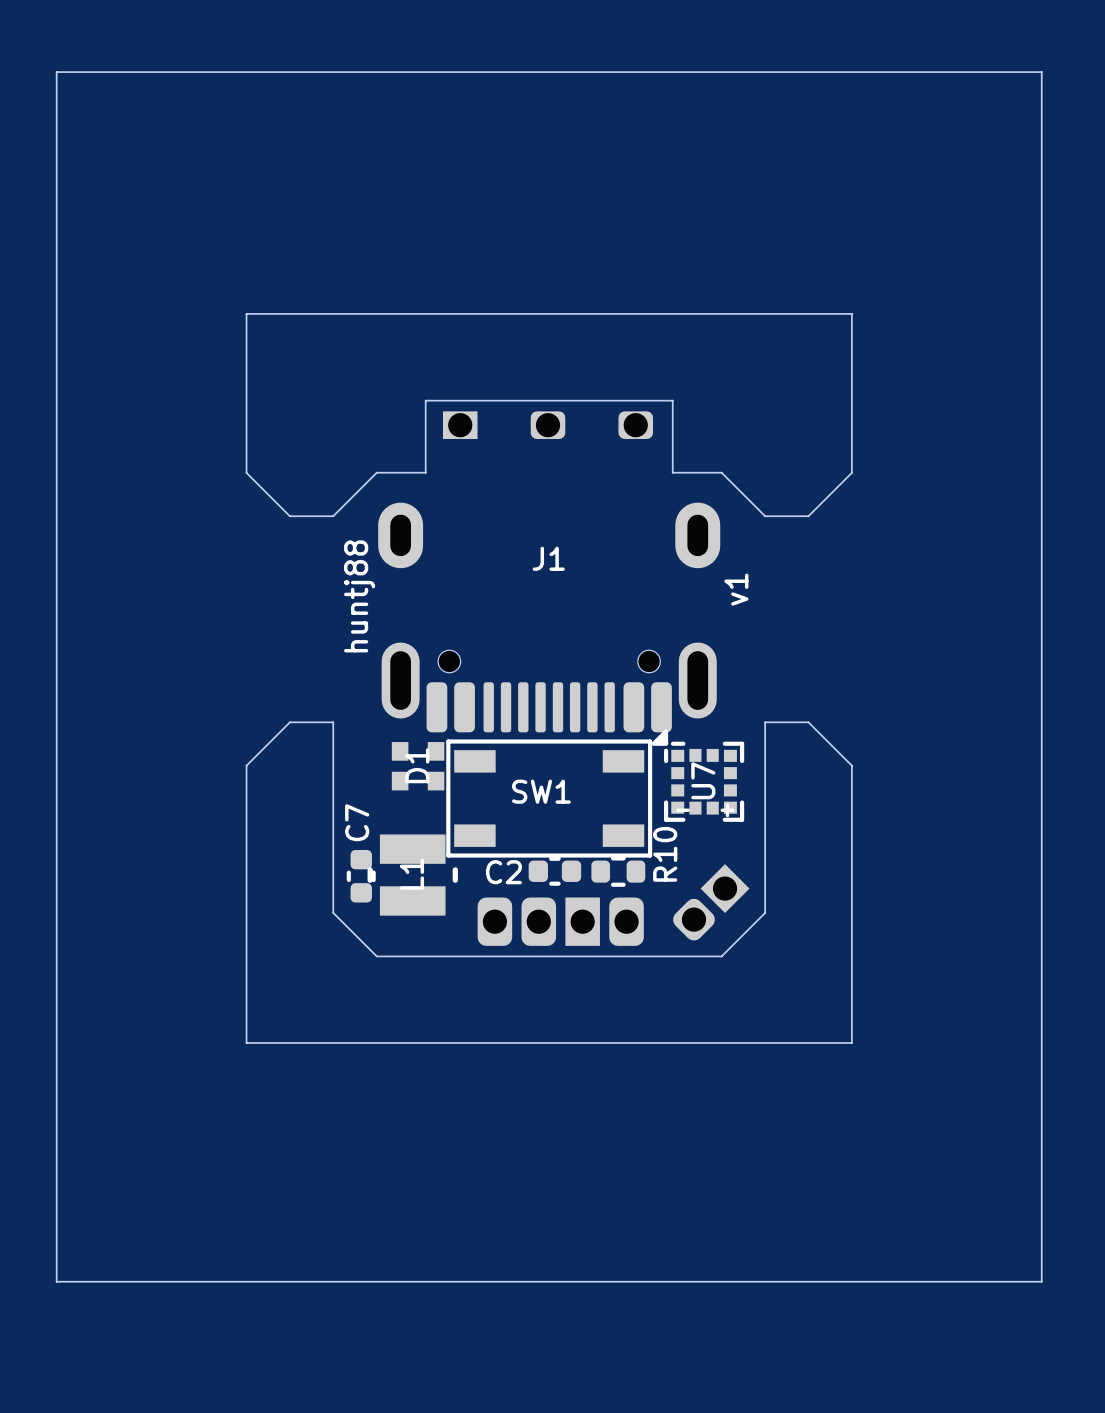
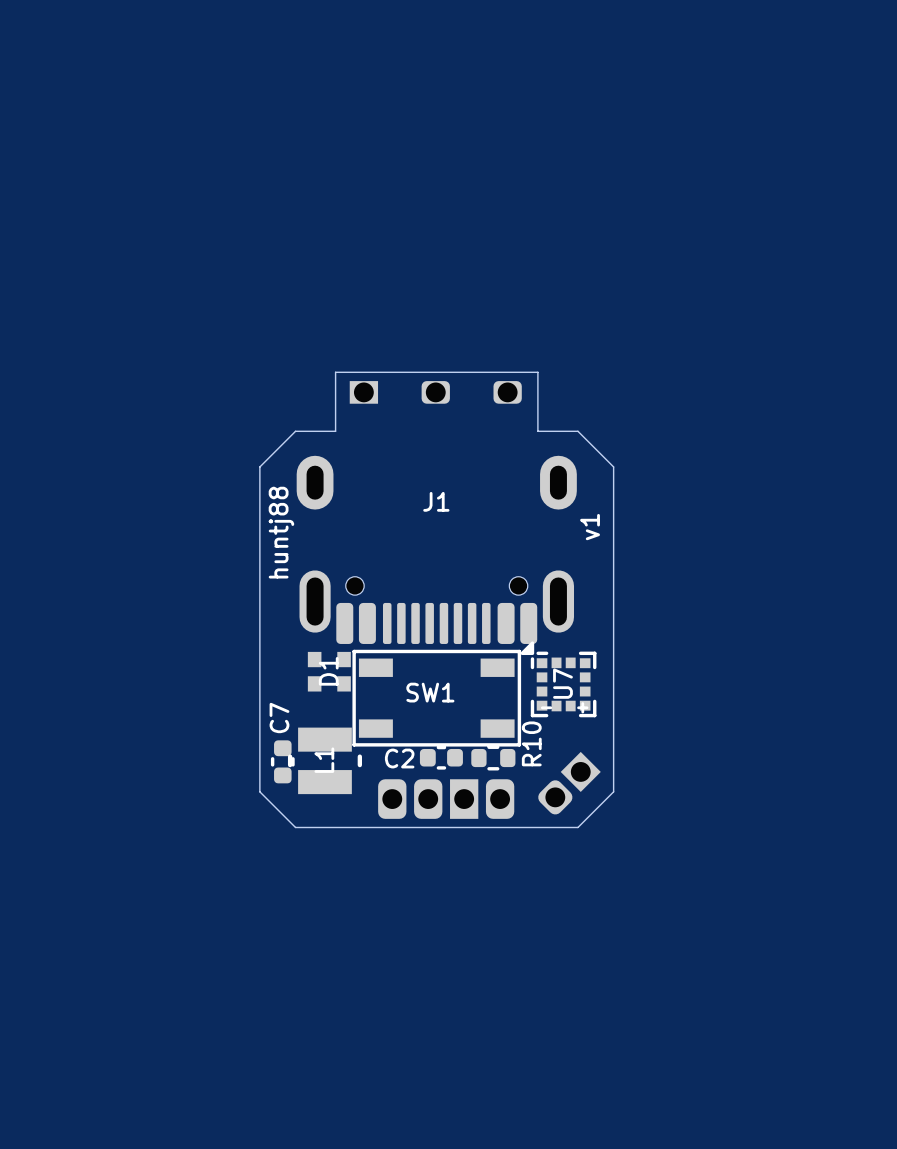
board edge: (56, 72) (1041, 72) (1041, 1281) (56, 1281) (56, 72) -> none
board edge: (333, 516) (289, 516) (246, 472) (246, 313) (851, 313) (851, 472) (808, 516) (765, 516) -> (613, 635) (613, 466)
board edge: (333, 722) (289, 722) (246, 765) (246, 1042) (851, 1042) (851, 765) (808, 722) (765, 722) -> (259, 635) (259, 466)

